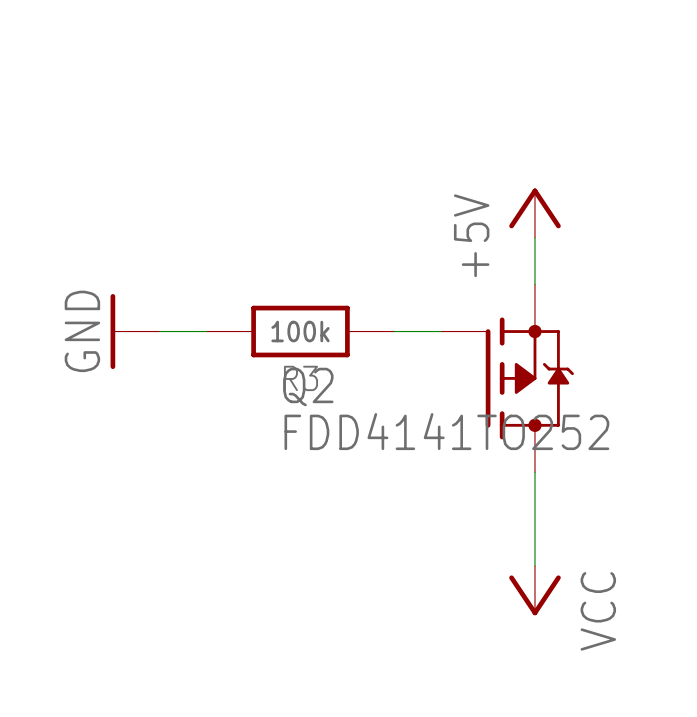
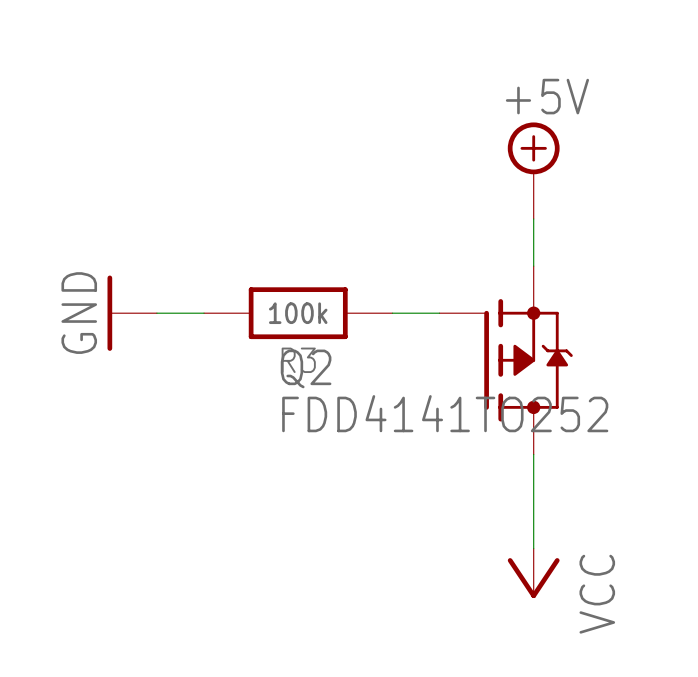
power symbol: none -> +5V (533, 170)
power symbol: +5V (534, 213) -> none

